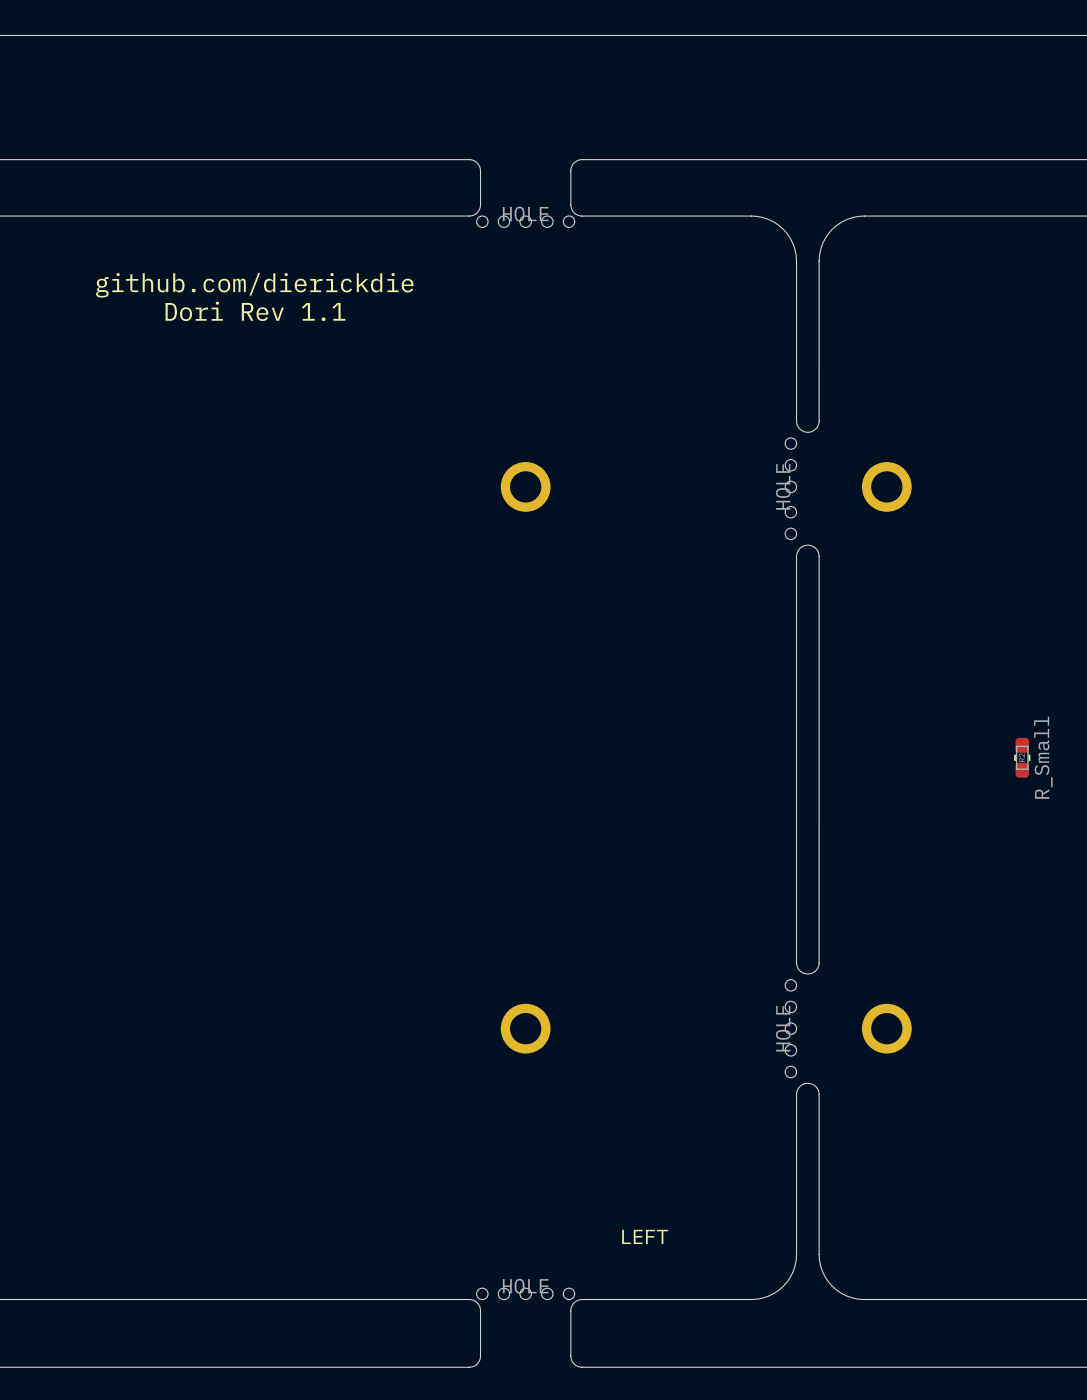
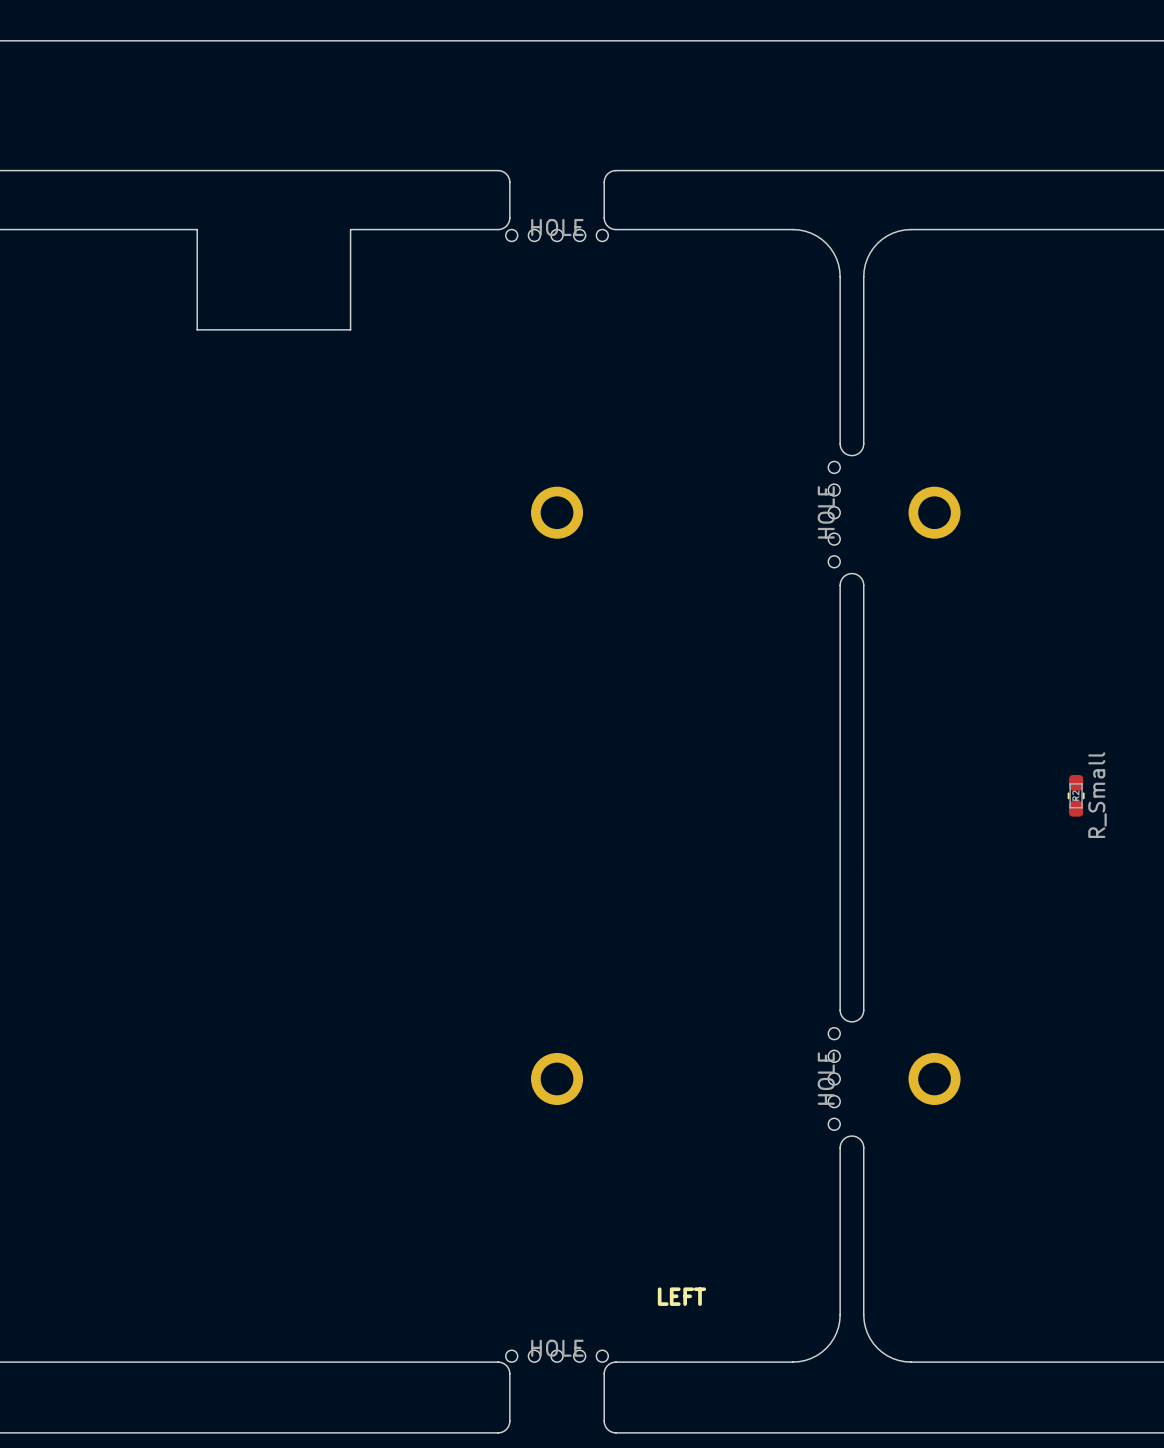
board edge: (181, 216) (328, 216) -> (197, 229) (197, 329) (350, 329) (350, 229)
text: github.com/dierickdie (254, 285) -> none
text: Dori Rev 1.1 (255, 311) -> none

